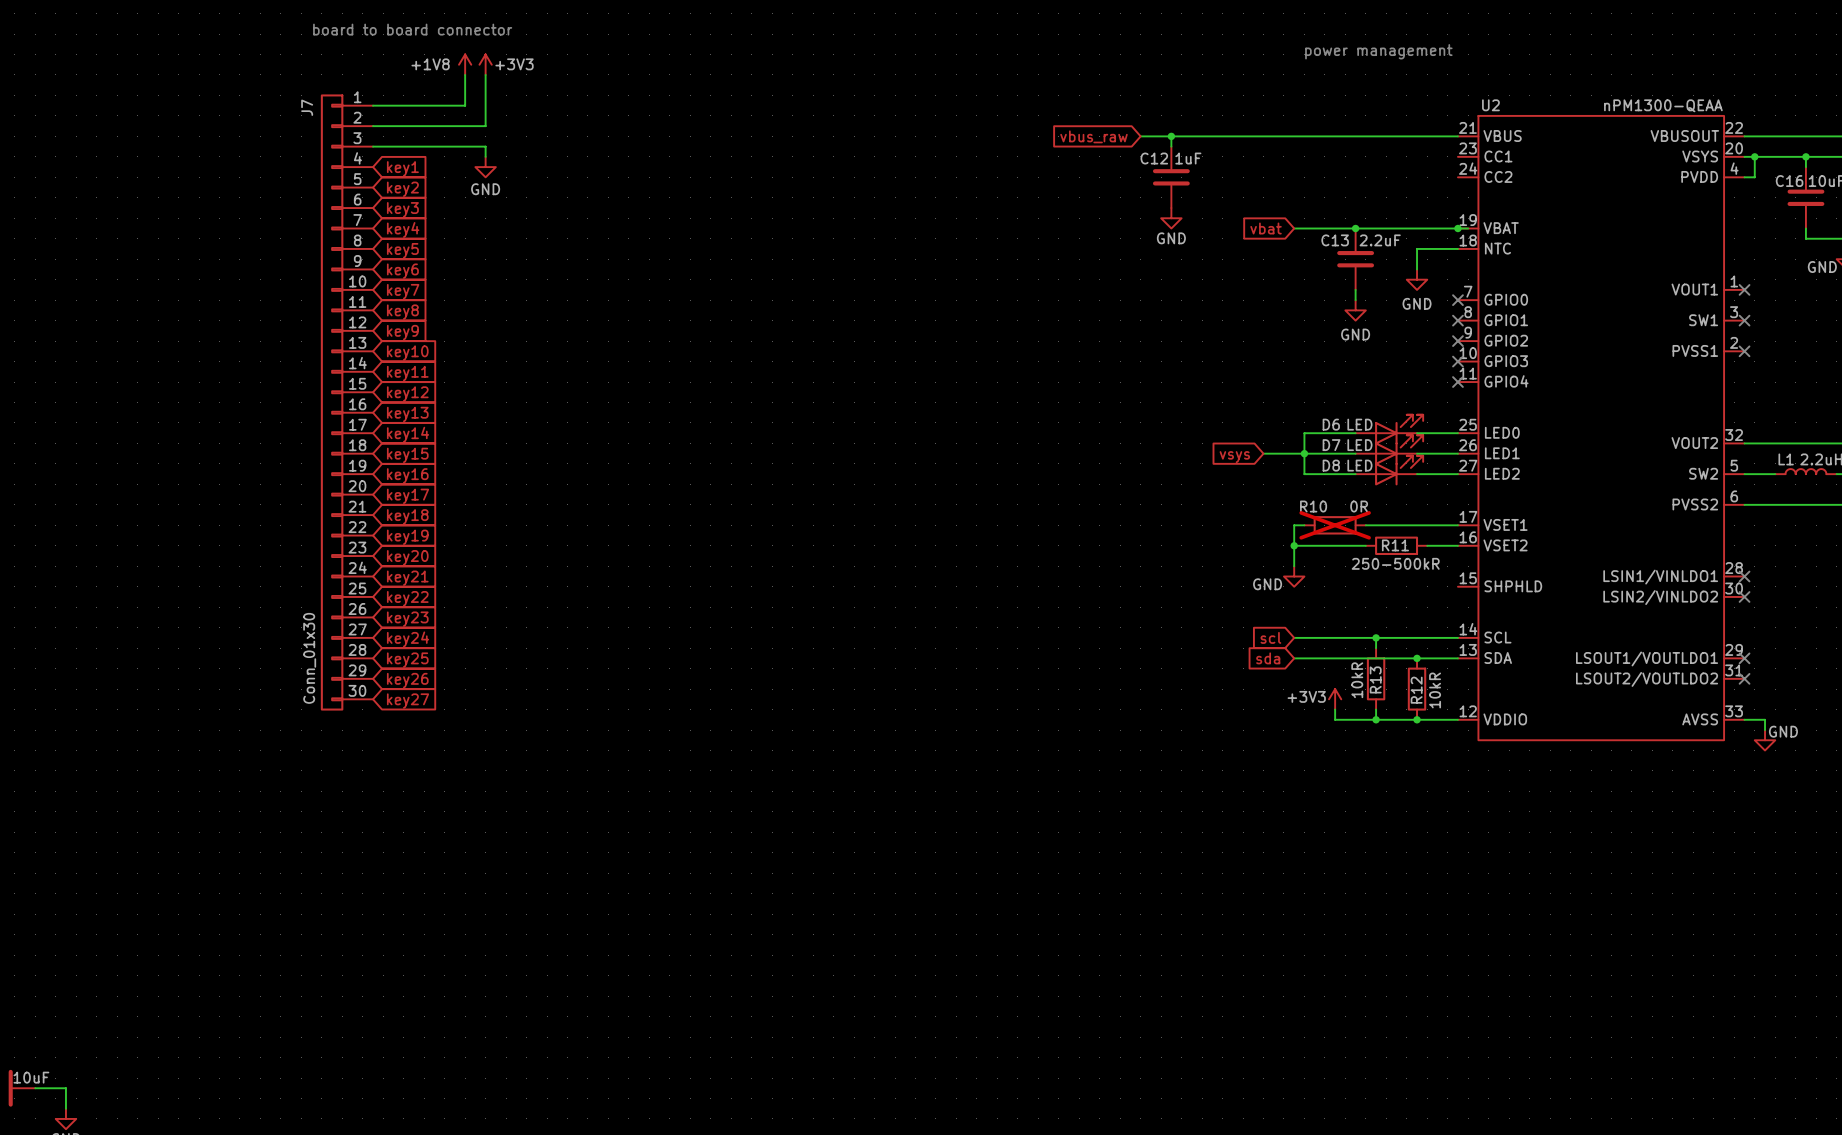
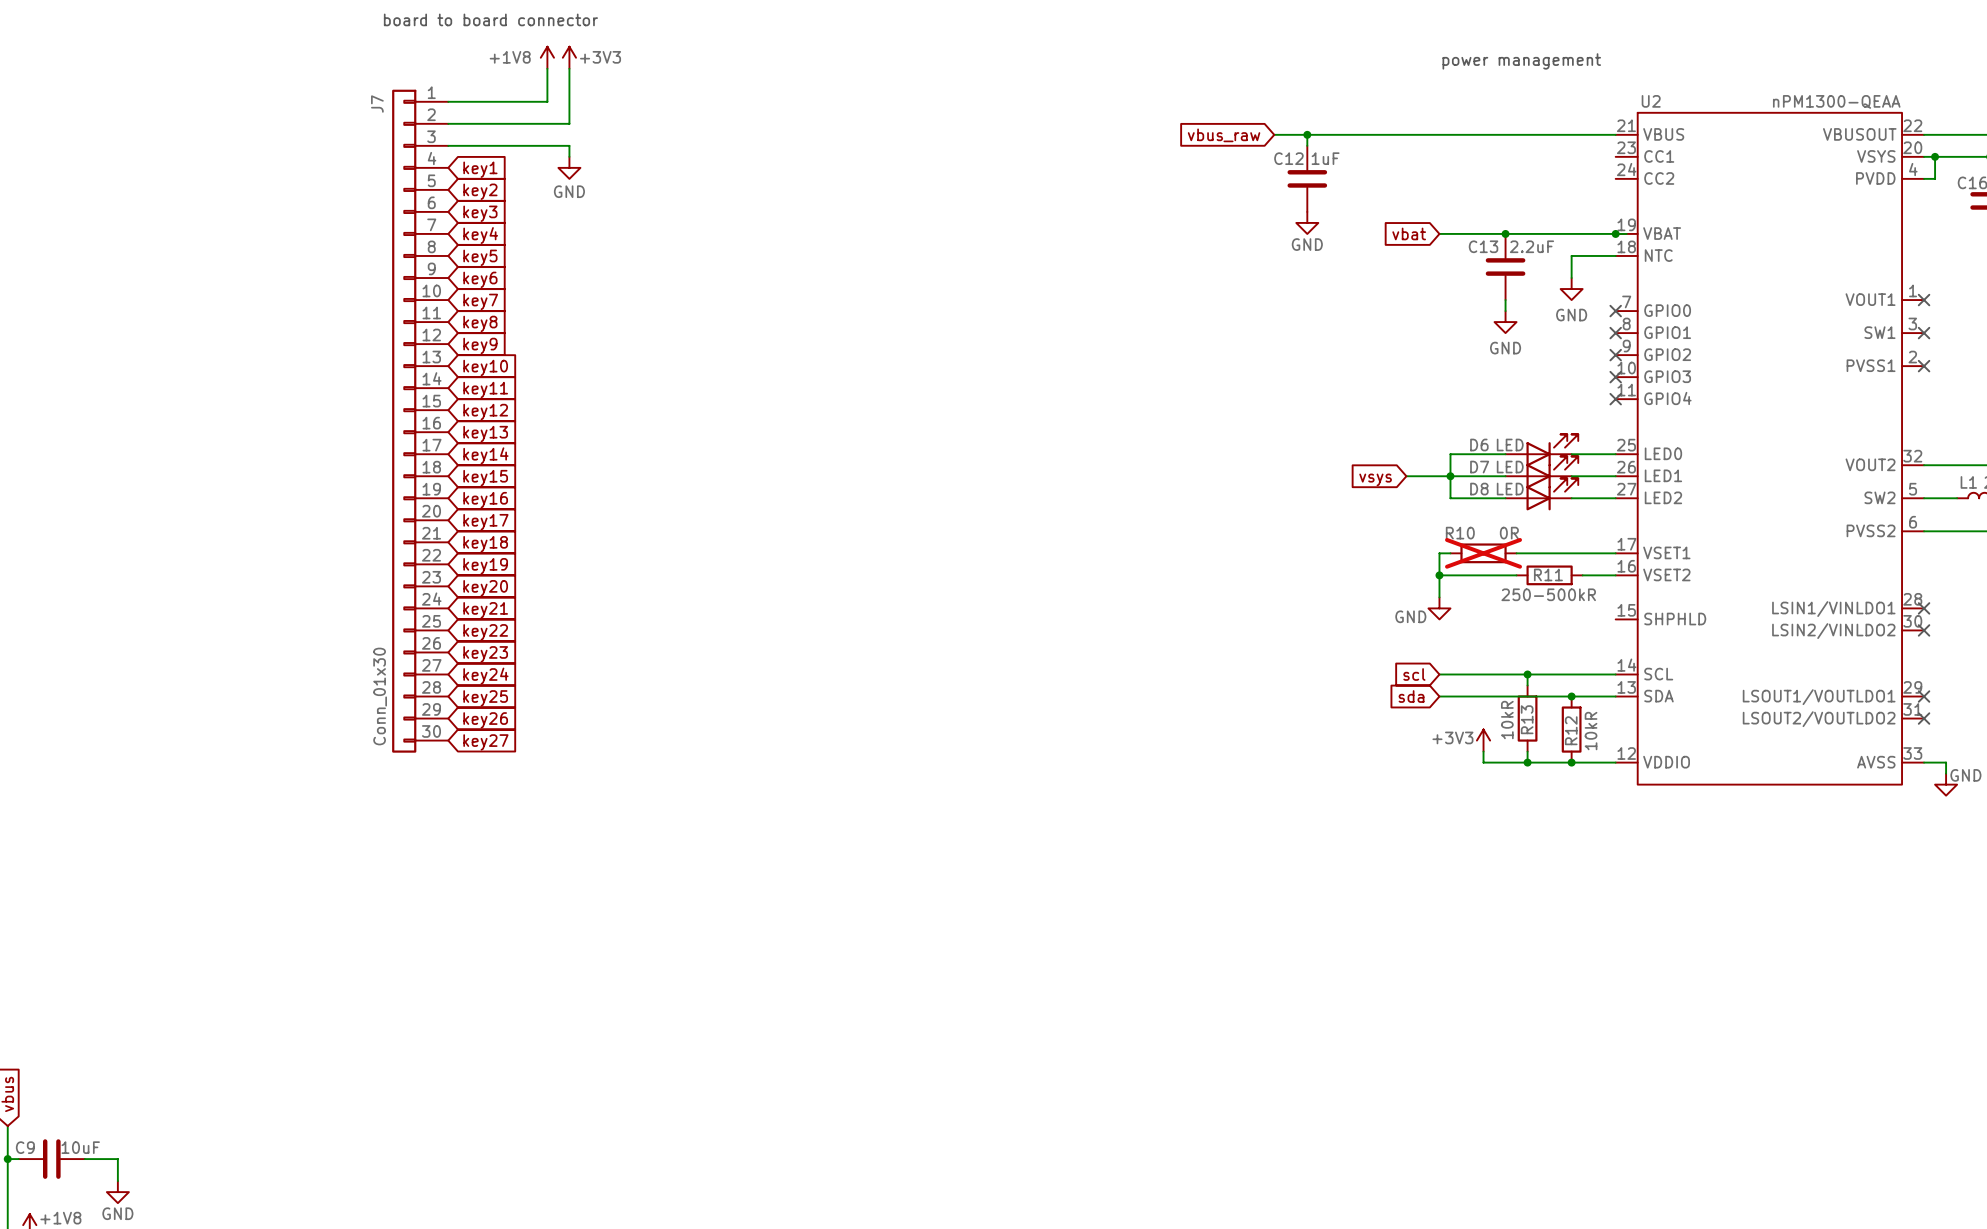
text position: power management (1378, 51) -> power management (1521, 61)

